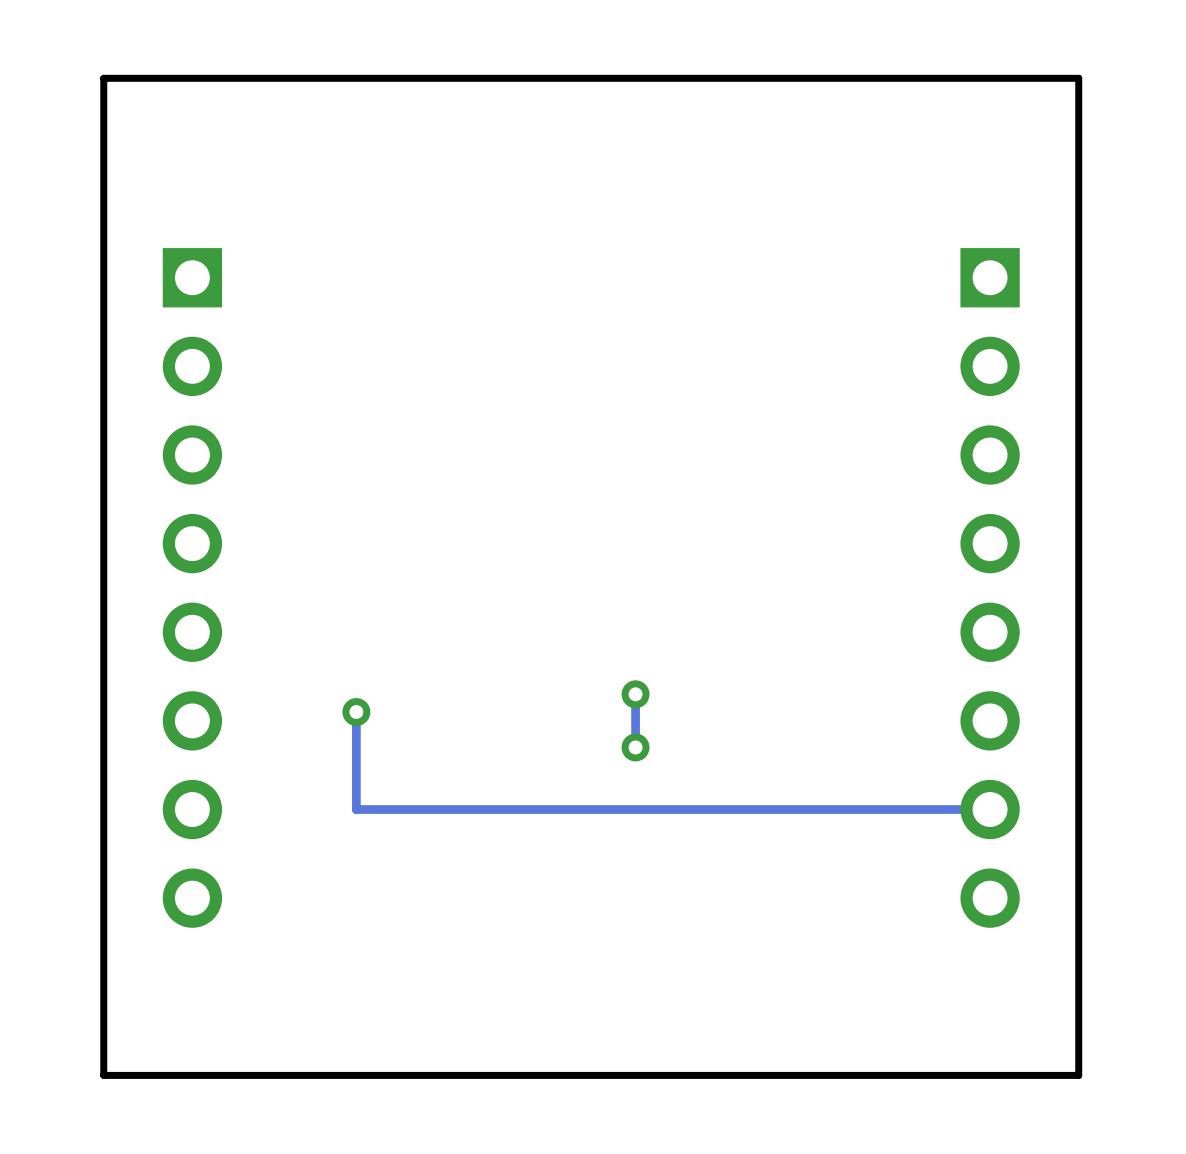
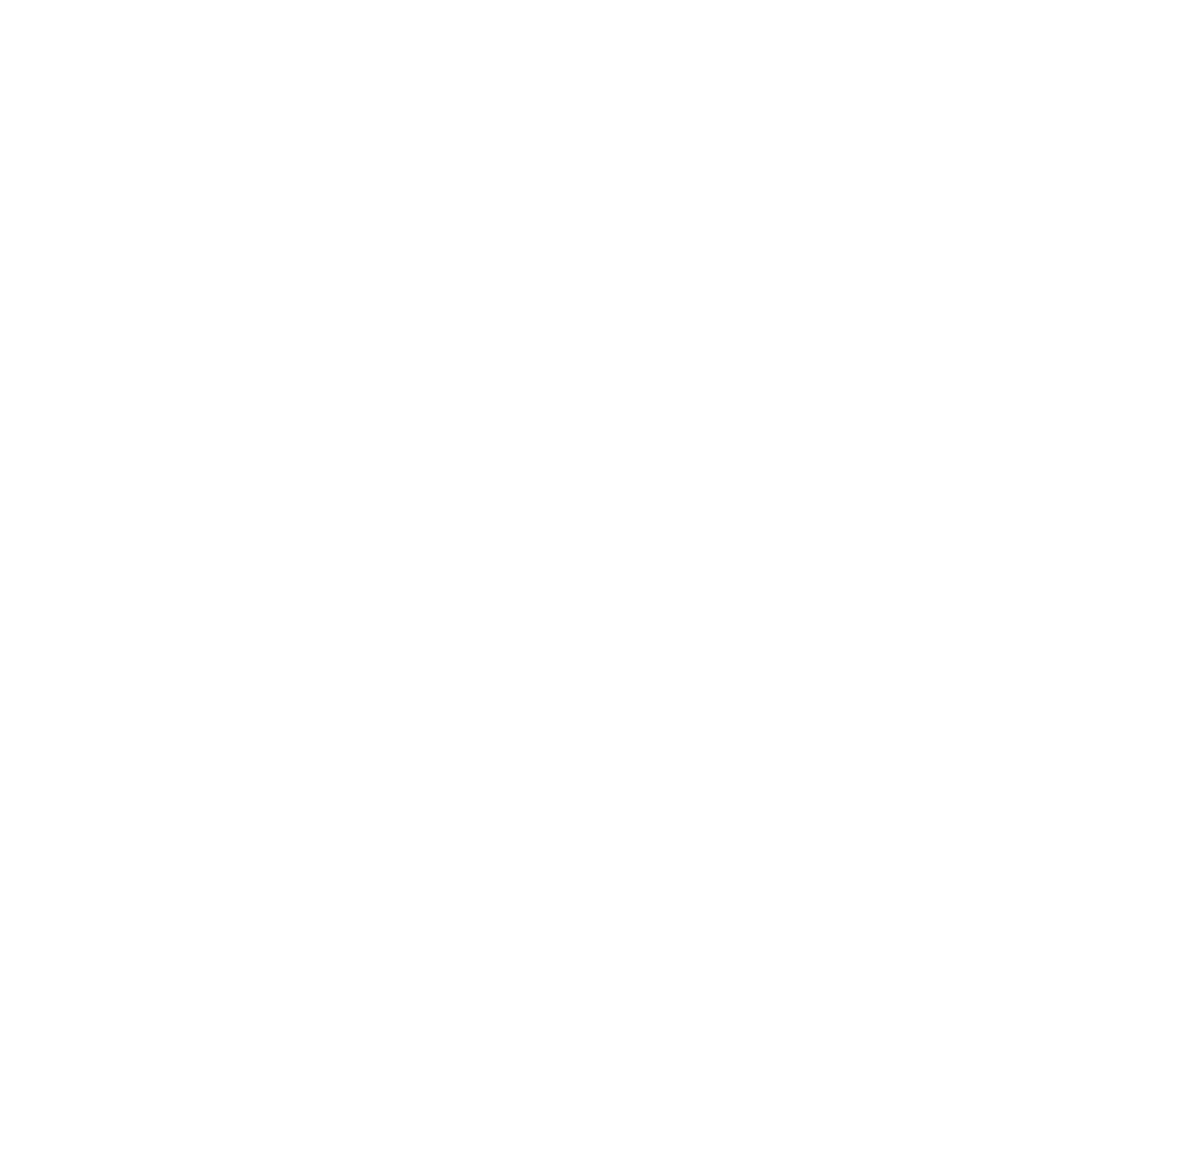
board edge: (1078, 78) (103, 78) (103, 1075) (1078, 1075) (1078, 78) -> none
part: (192, 587) -> none
part: (990, 587) -> none
track: (635, 694) (635, 747) -> none
via: (635, 694) -> none
track: (356, 712) (356, 809) (990, 809) -> none
via: (356, 712) -> none
via: (635, 747) -> none

